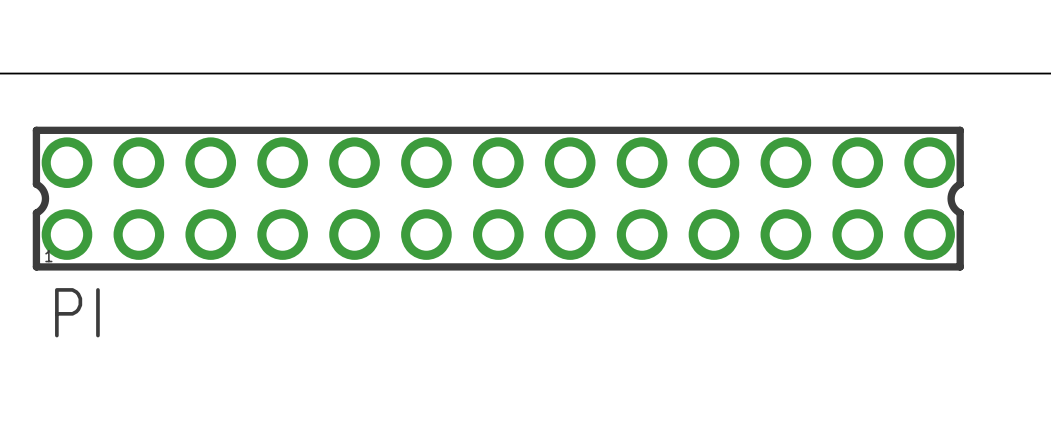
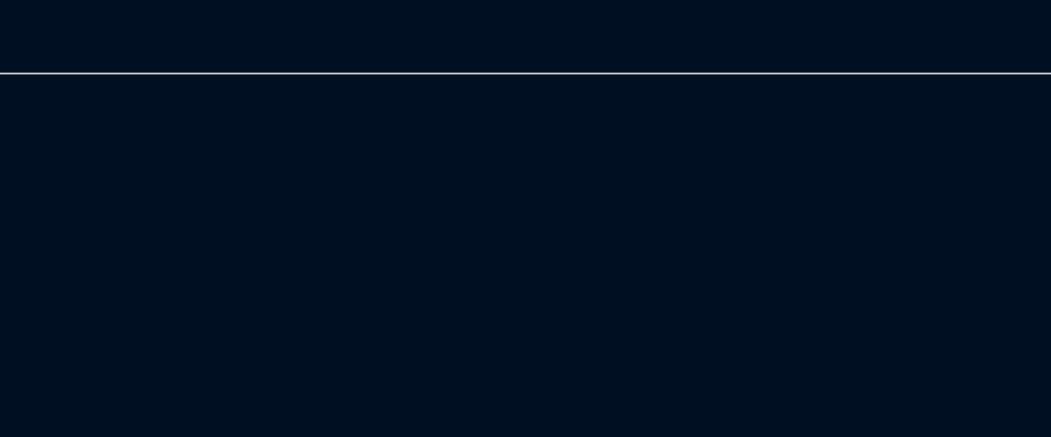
PI: (498, 198) -> none

